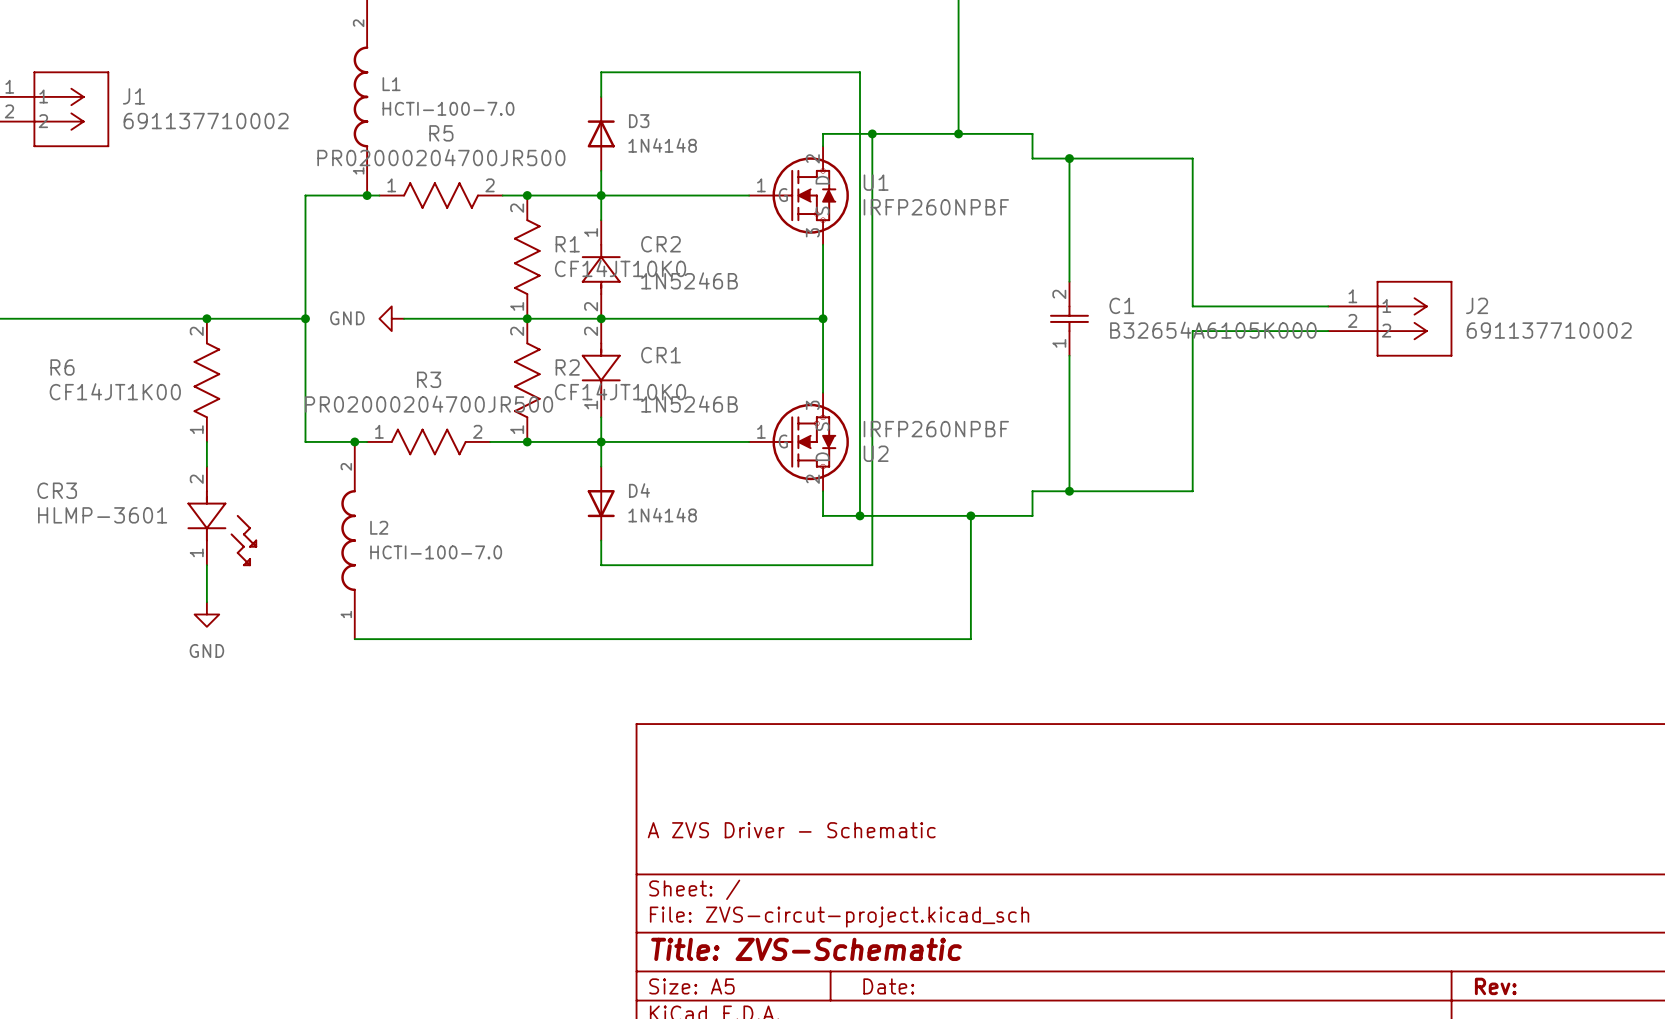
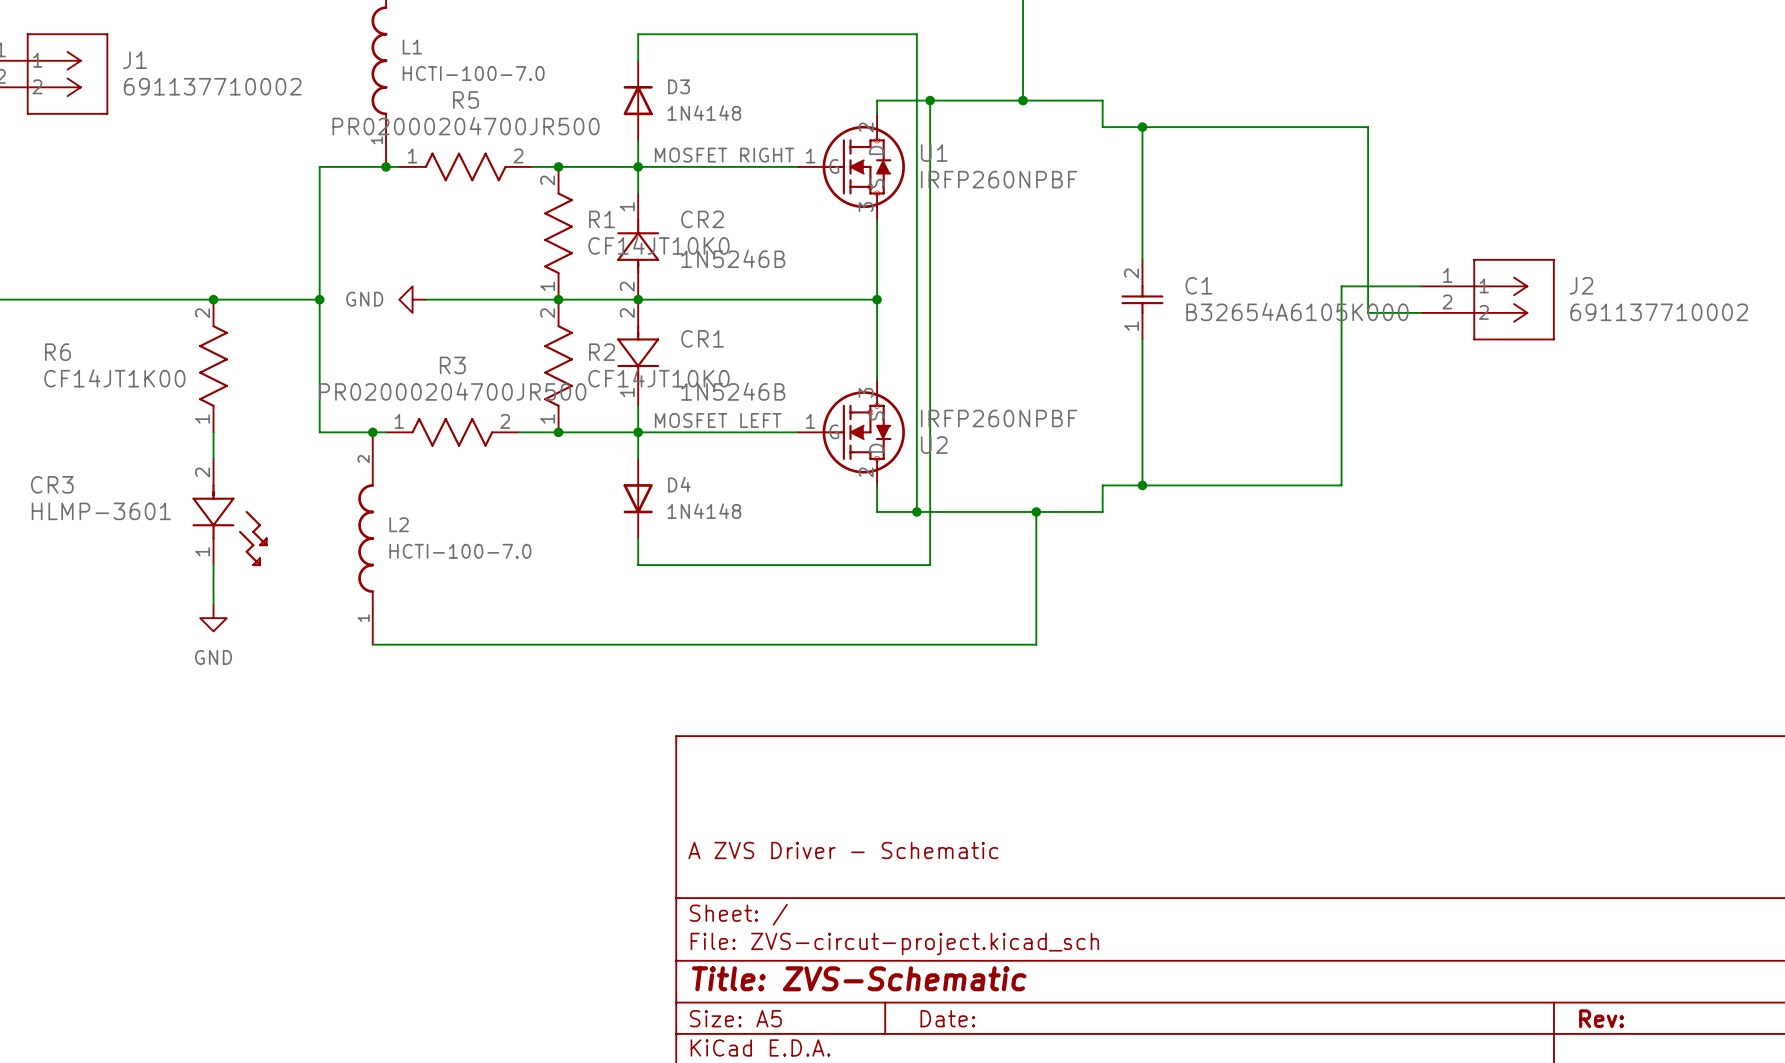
wire: (1192, 158) (1192, 306) (1254, 306) -> (1275, 127) (1368, 127) (1368, 312)
label: none -> MOSFET RIGHT (724, 155)
wire: (1278, 331) (1192, 331) (1192, 491) -> (1341, 286) (1341, 485) (1275, 485)
label: none -> MOSFET LEFT (718, 420)

